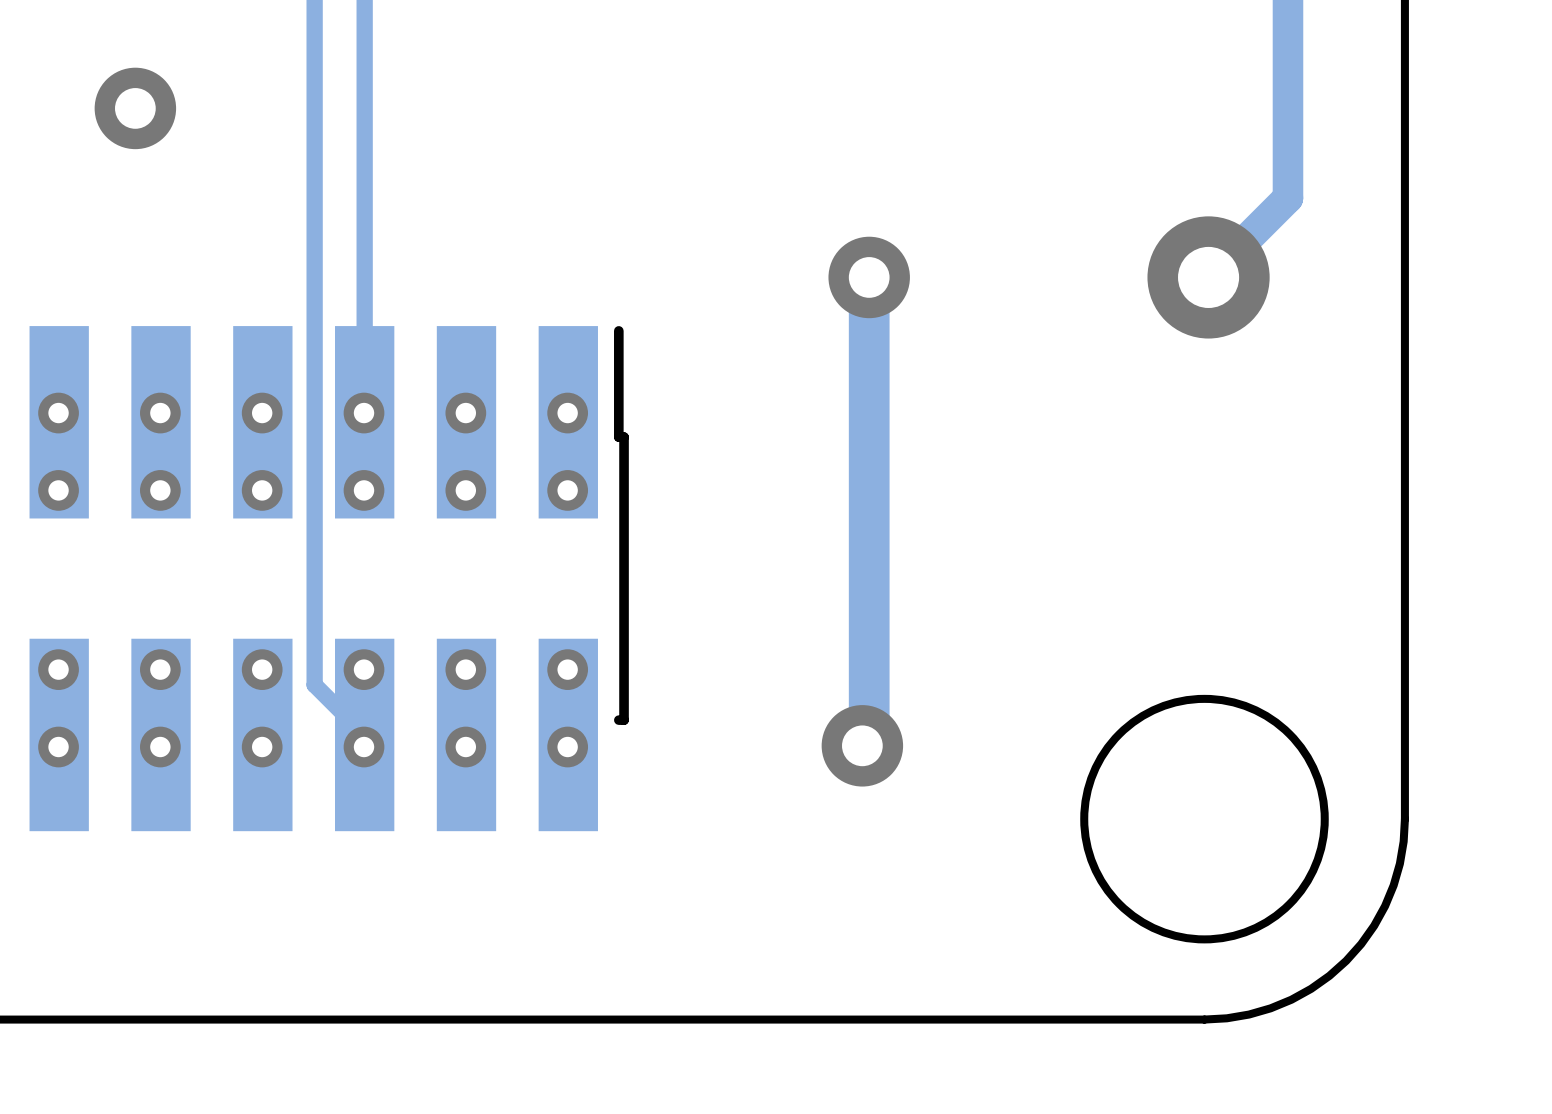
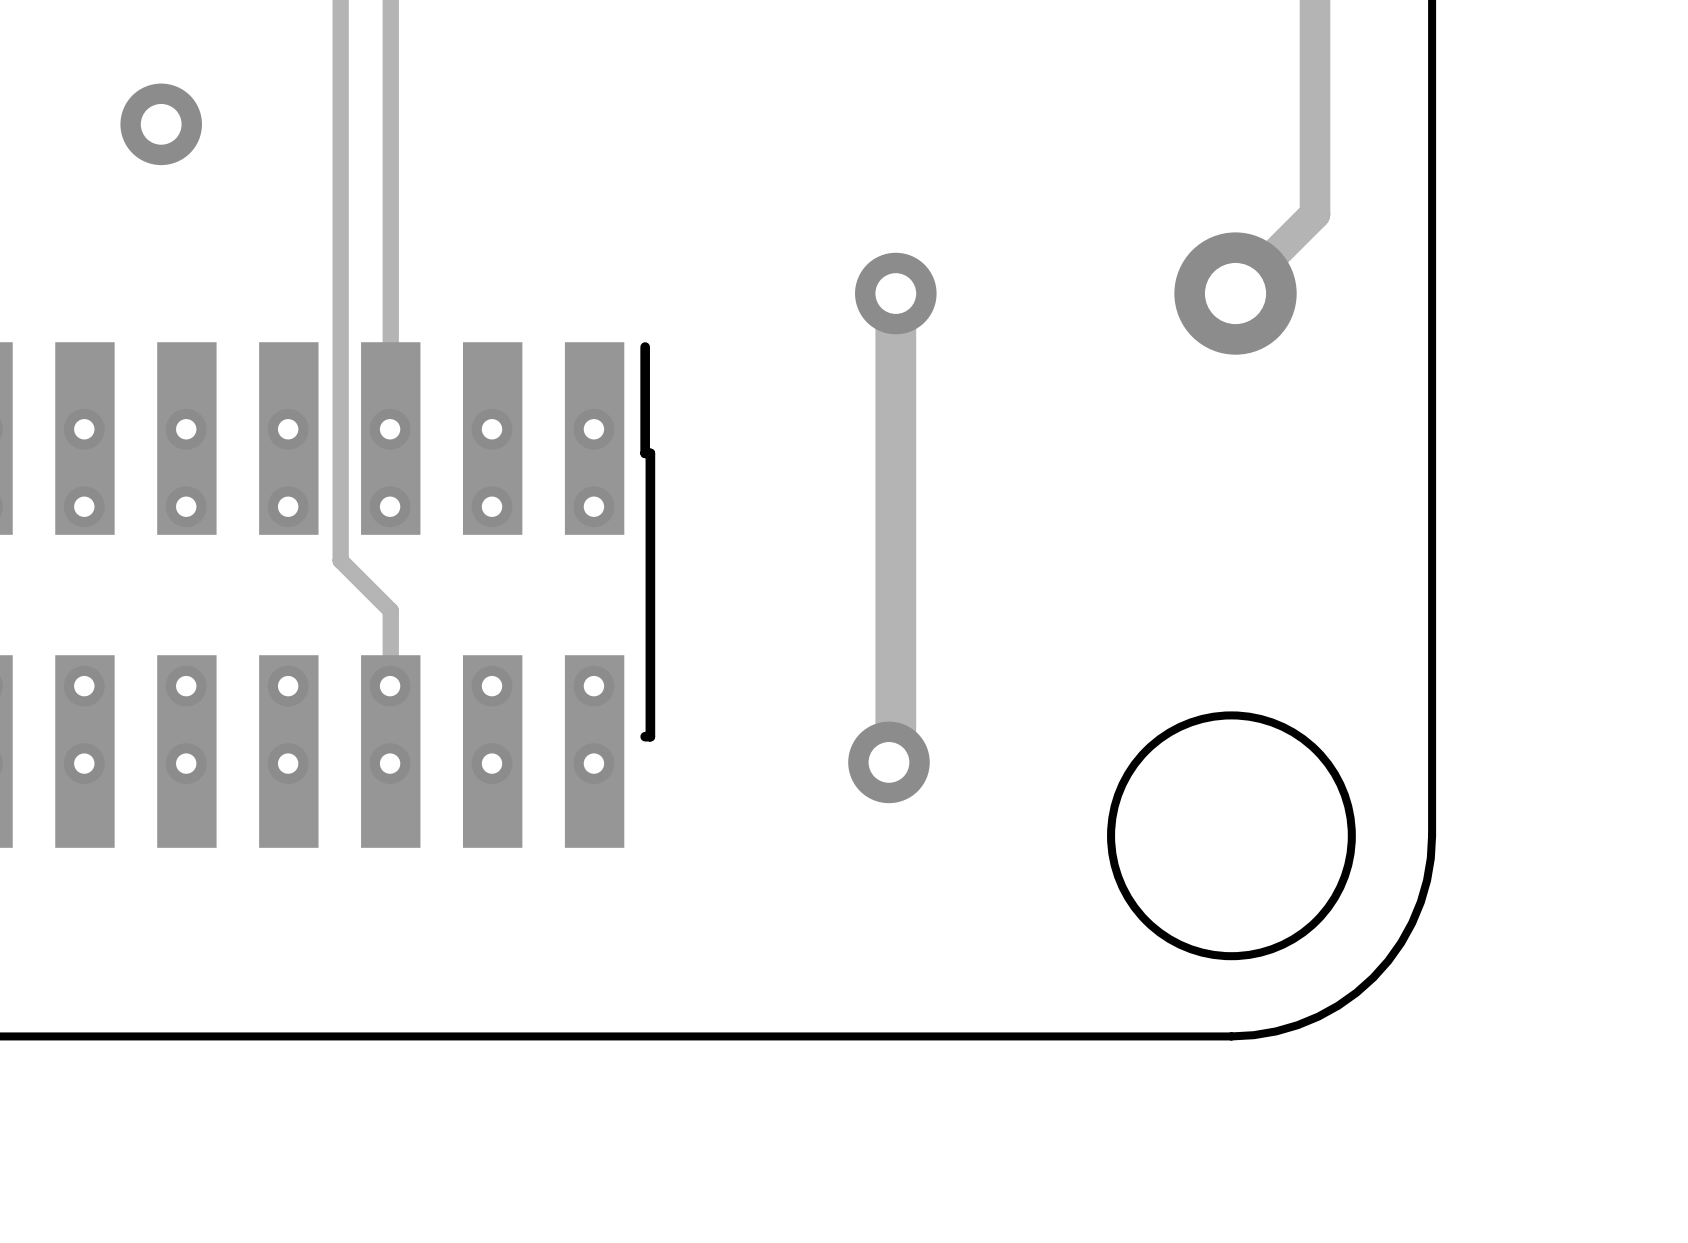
track: (314, 544) (314, 684) (364, 734) -> (340, 560) (390, 610) (390, 751)

